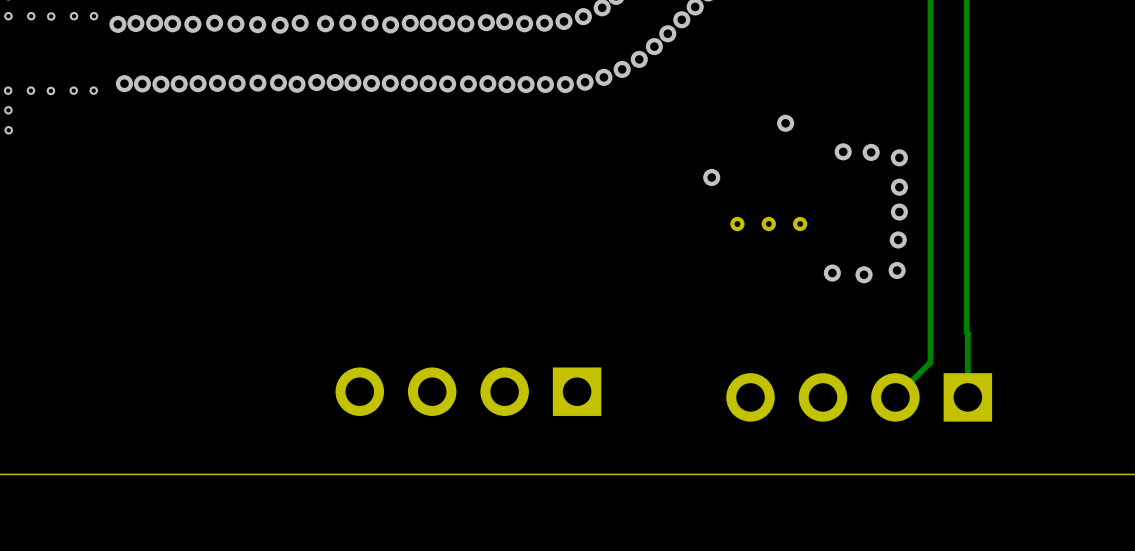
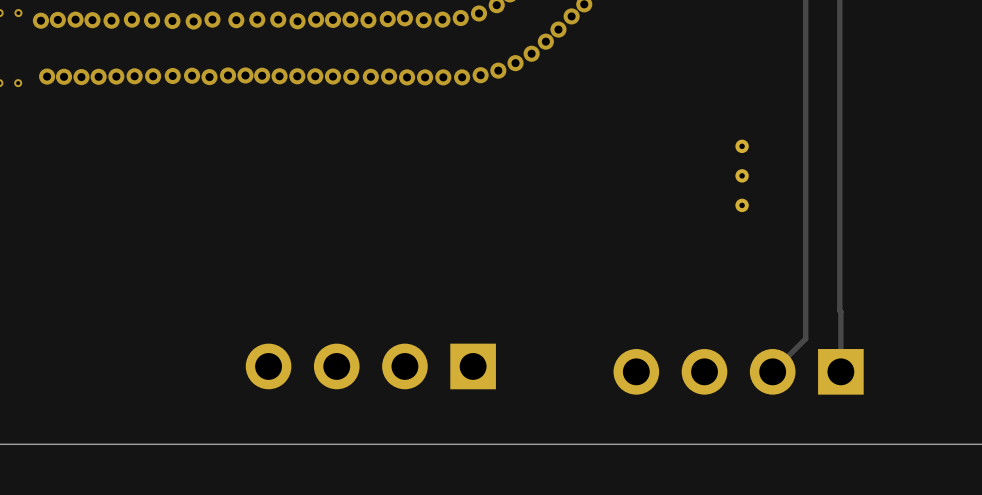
via: (785, 123) -> none
via: (843, 151) -> none
via: (871, 152) -> none
via: (899, 157) -> none
via: (711, 177) -> none
via: (899, 187) -> none
via: (899, 212) -> none
part rotation: 0° (768, 223) -> 90° clockwise (742, 175)
part position: (768, 223) -> (742, 175)
via: (898, 239) -> none
via: (897, 270) -> none
via: (832, 273) -> none
via: (864, 274) -> none

